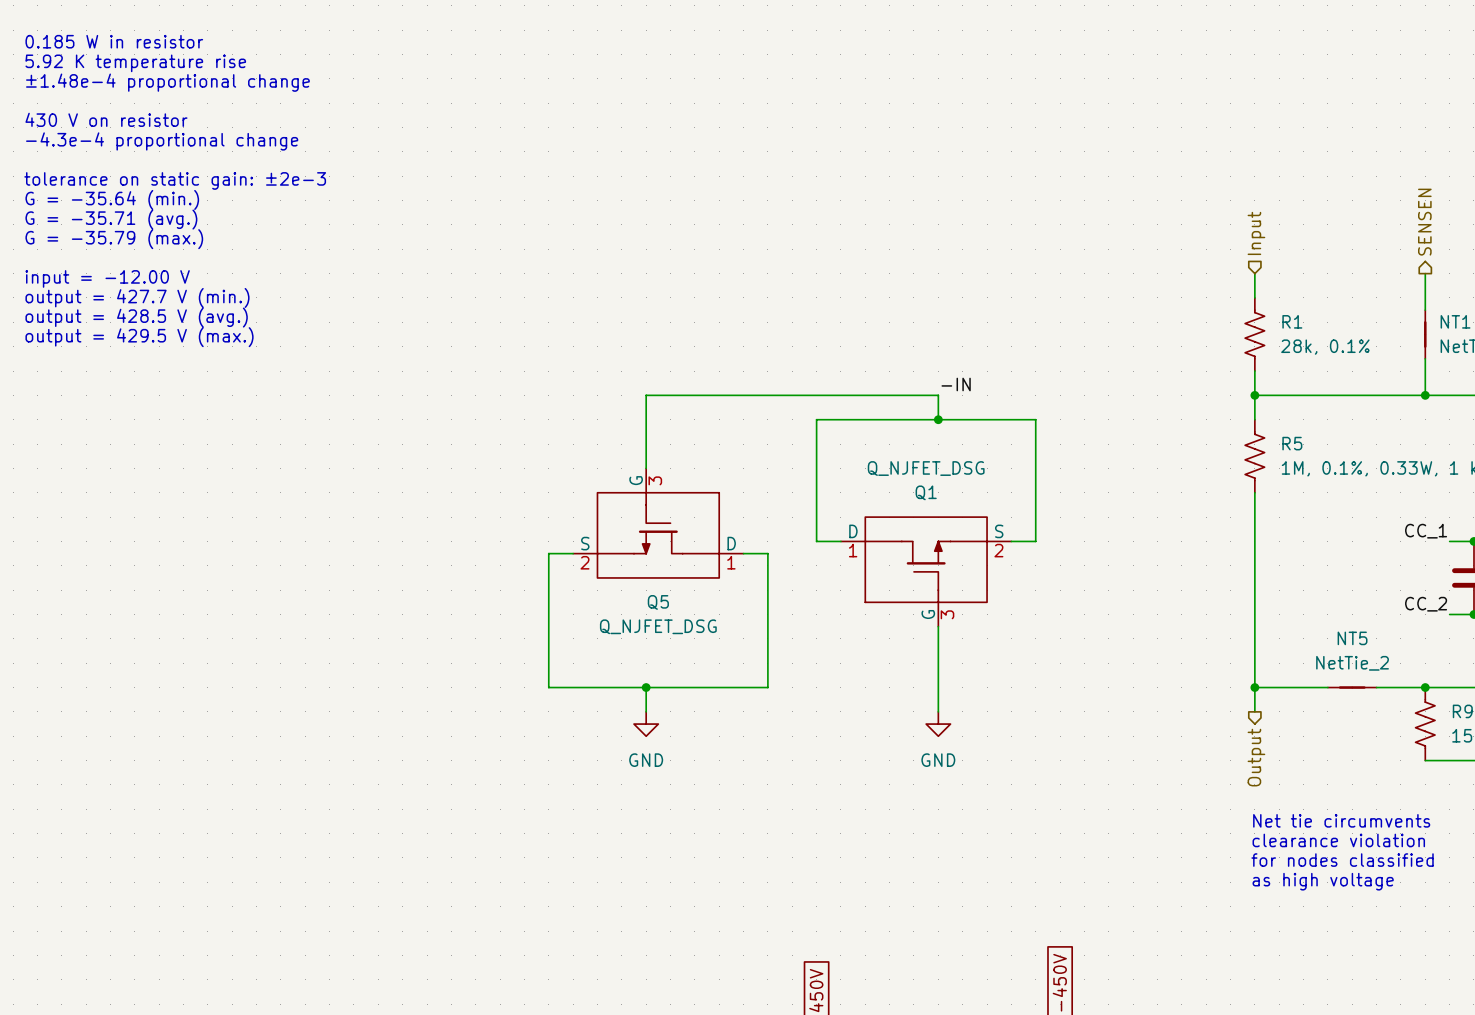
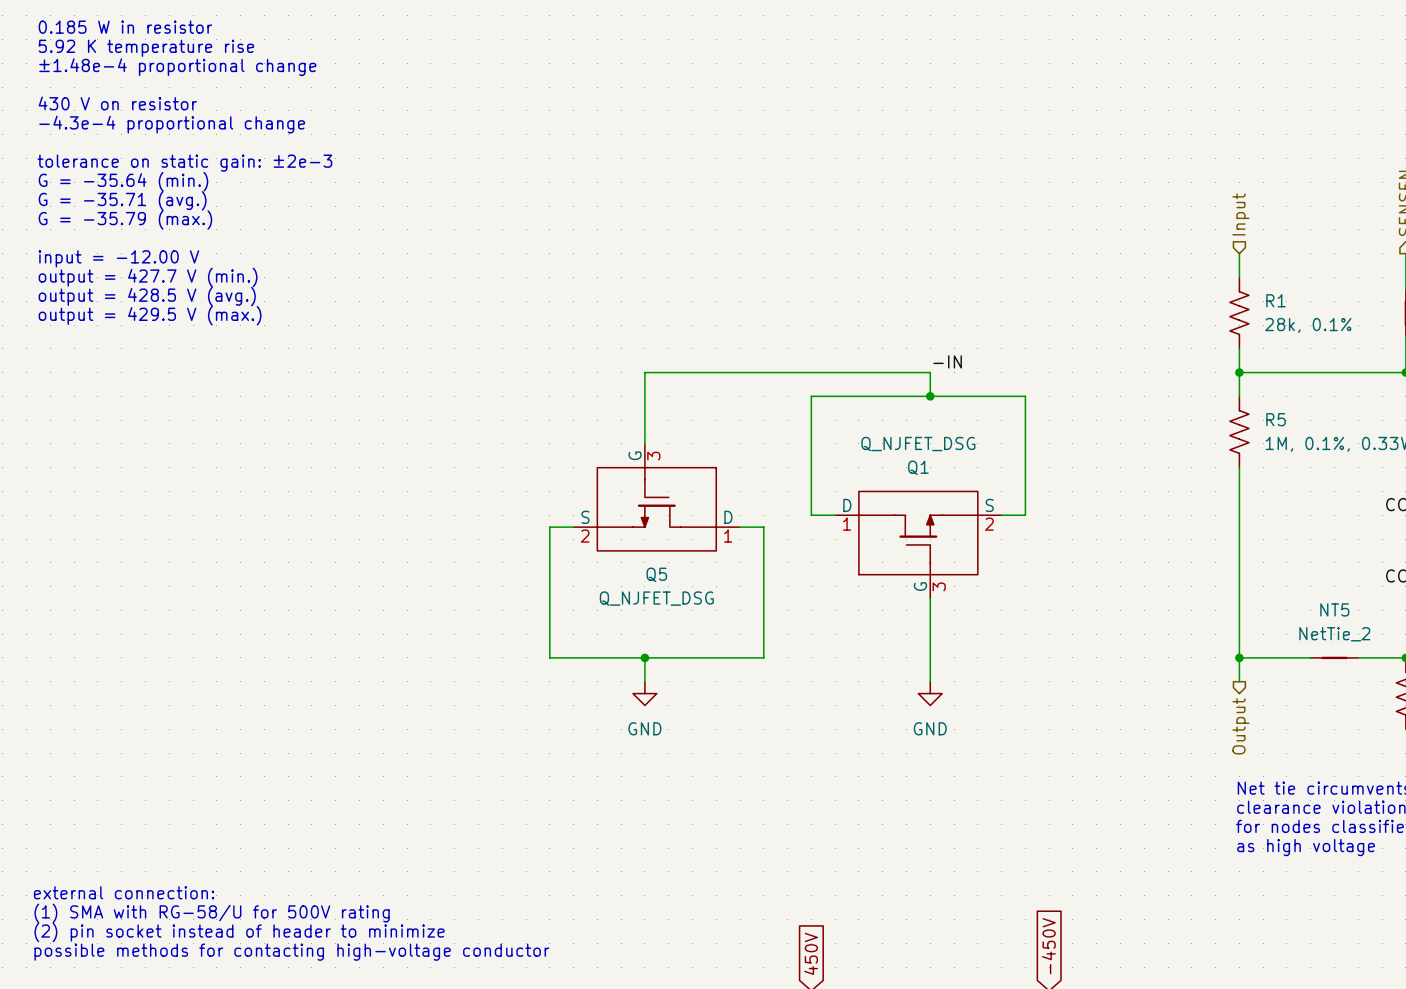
text: none -> external connection: (124, 892)
text: none -> (1) SMA with RG-58/U for 500V rating (212, 913)
text: none -> (2) pin socket instead of header to minimize (239, 932)
text: none -> possible methods for contacting high-voltage conductor (291, 952)

